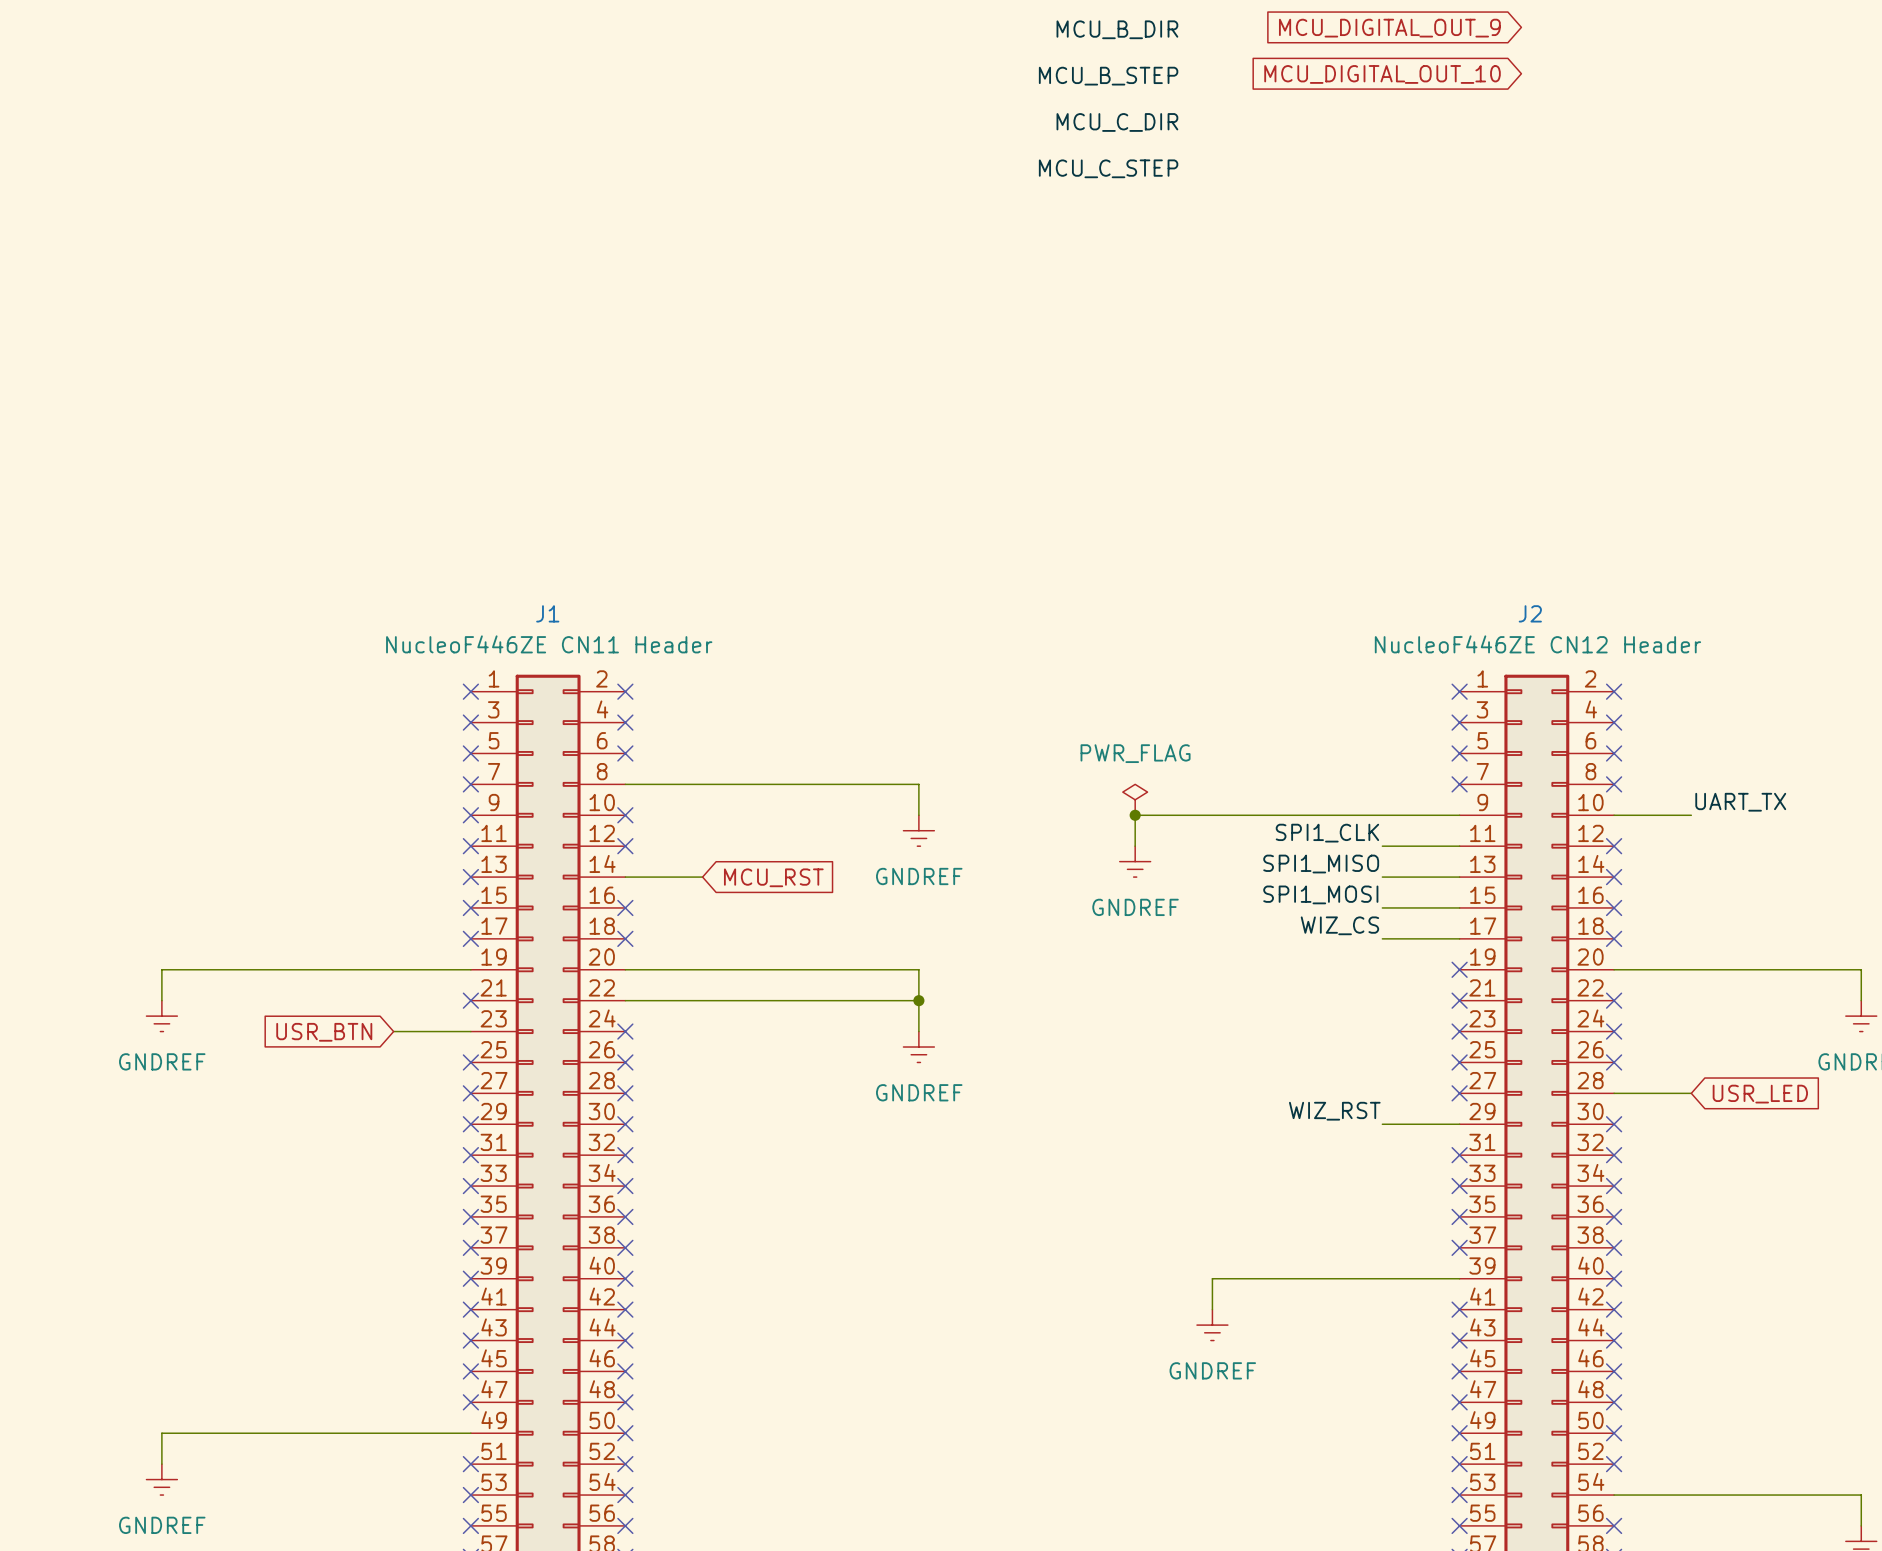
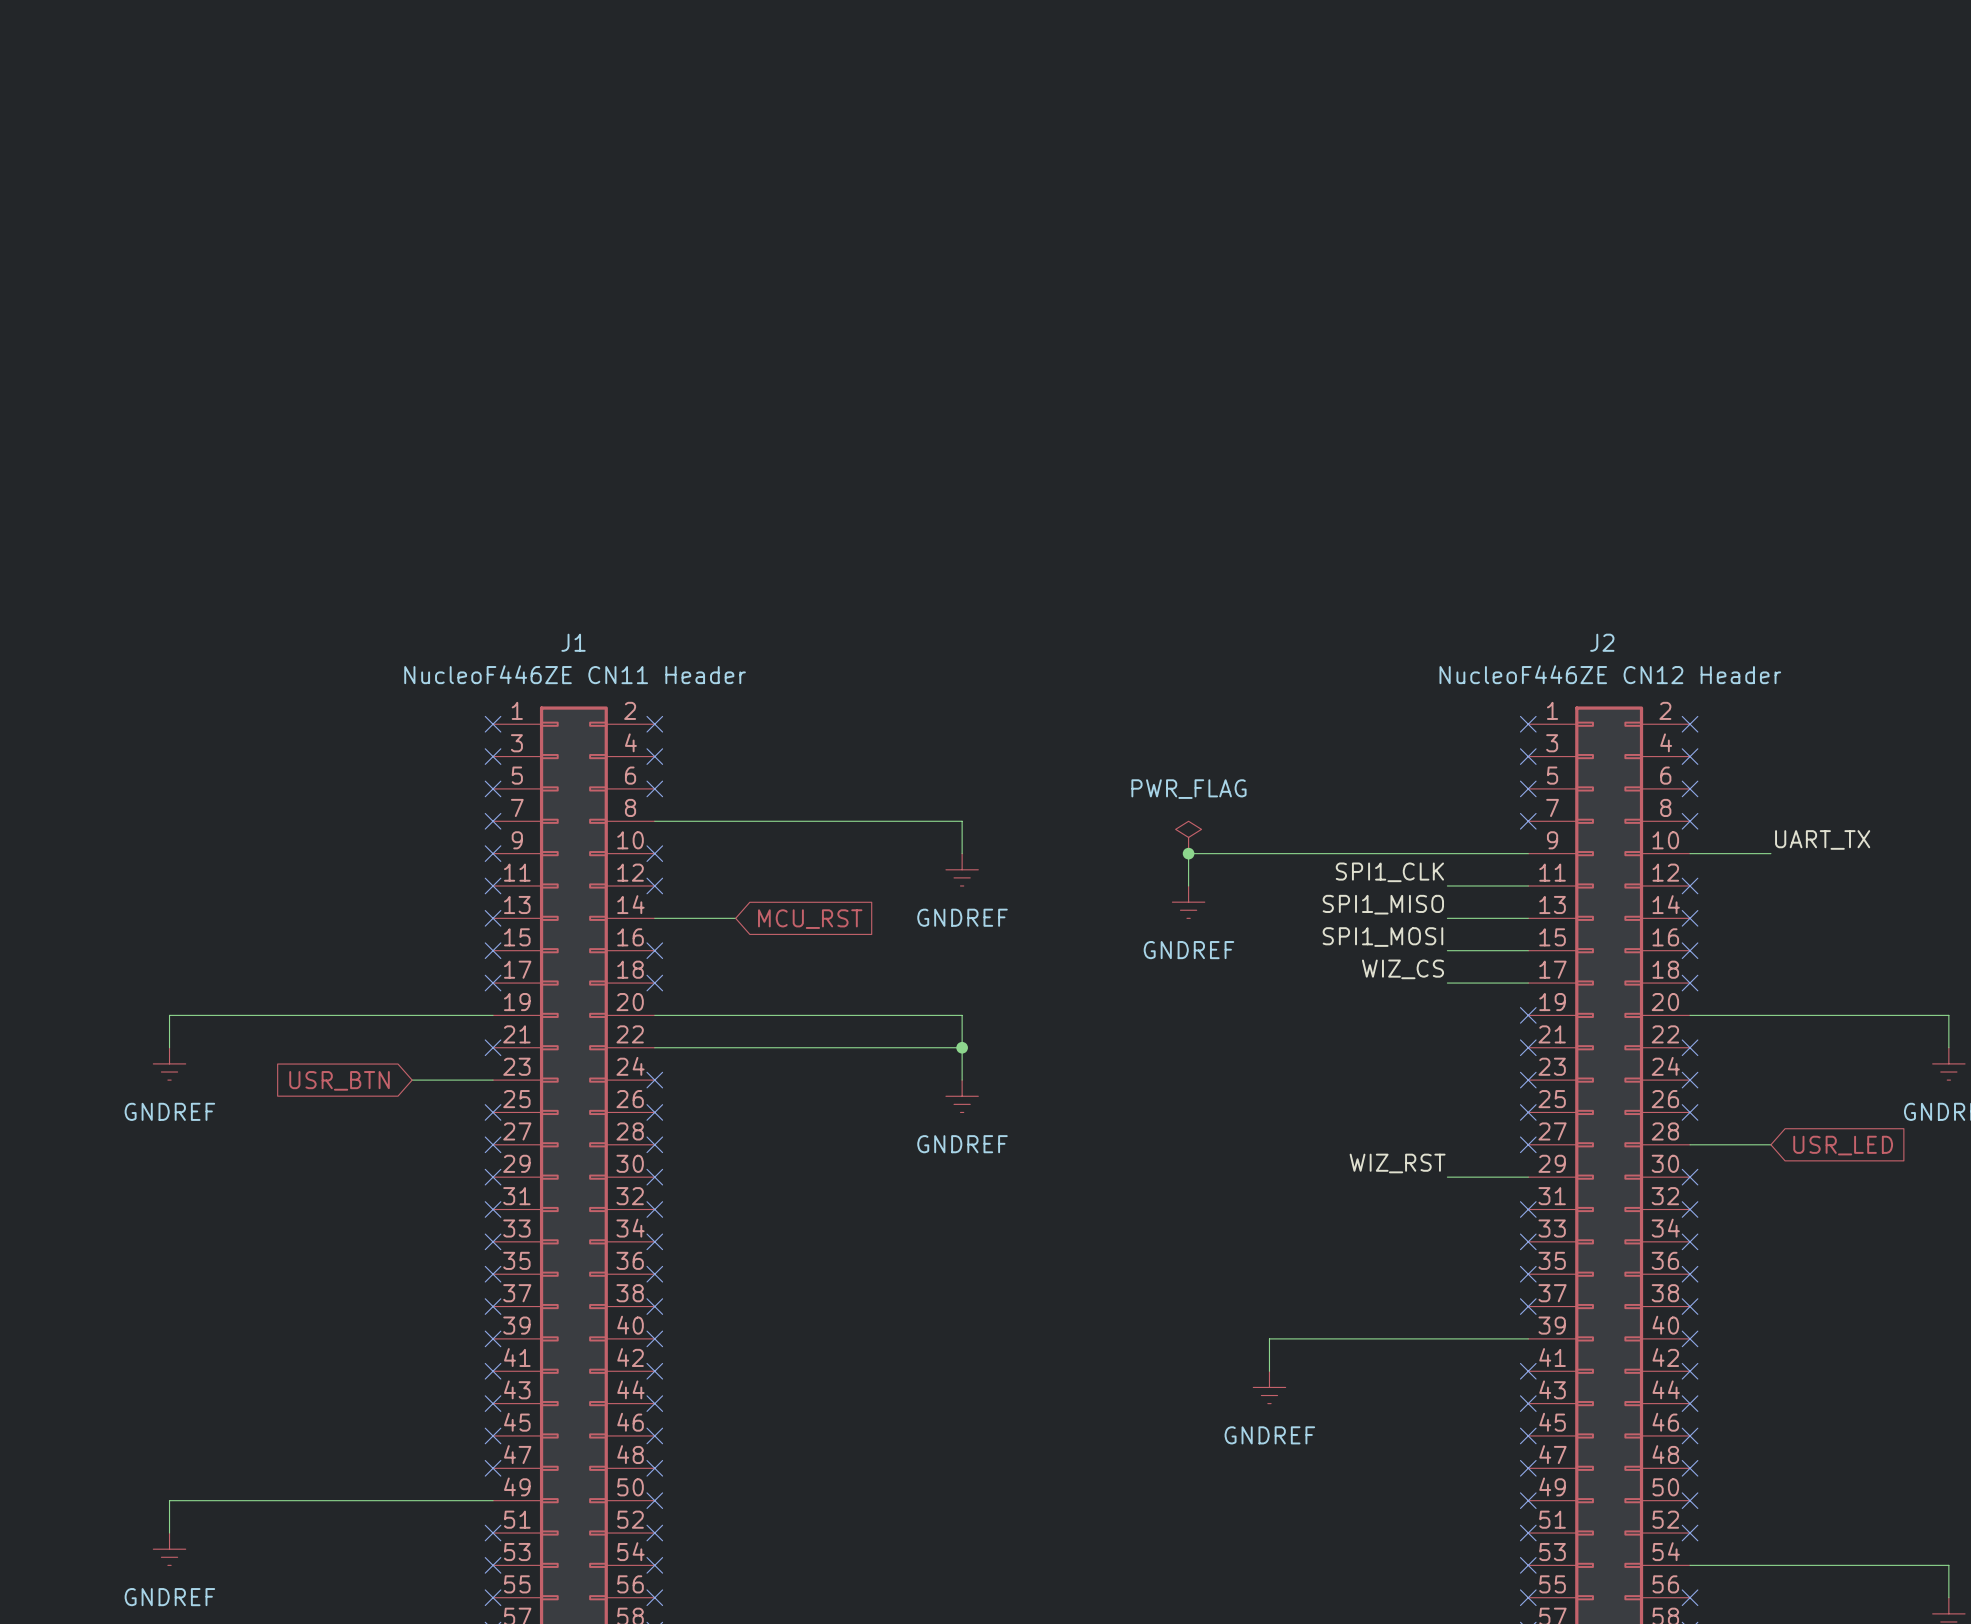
global label: MCU_DIGITAL_OUT_9 (1389, 28) -> none
label: MCU_B_DIR (1117, 29) -> none
global label: MCU_DIGITAL_OUT_10 (1382, 74) -> none
label: MCU_B_STEP (1108, 76) -> none
label: MCU_C_DIR (1117, 122) -> none
label: MCU_C_STEP (1108, 168) -> none

